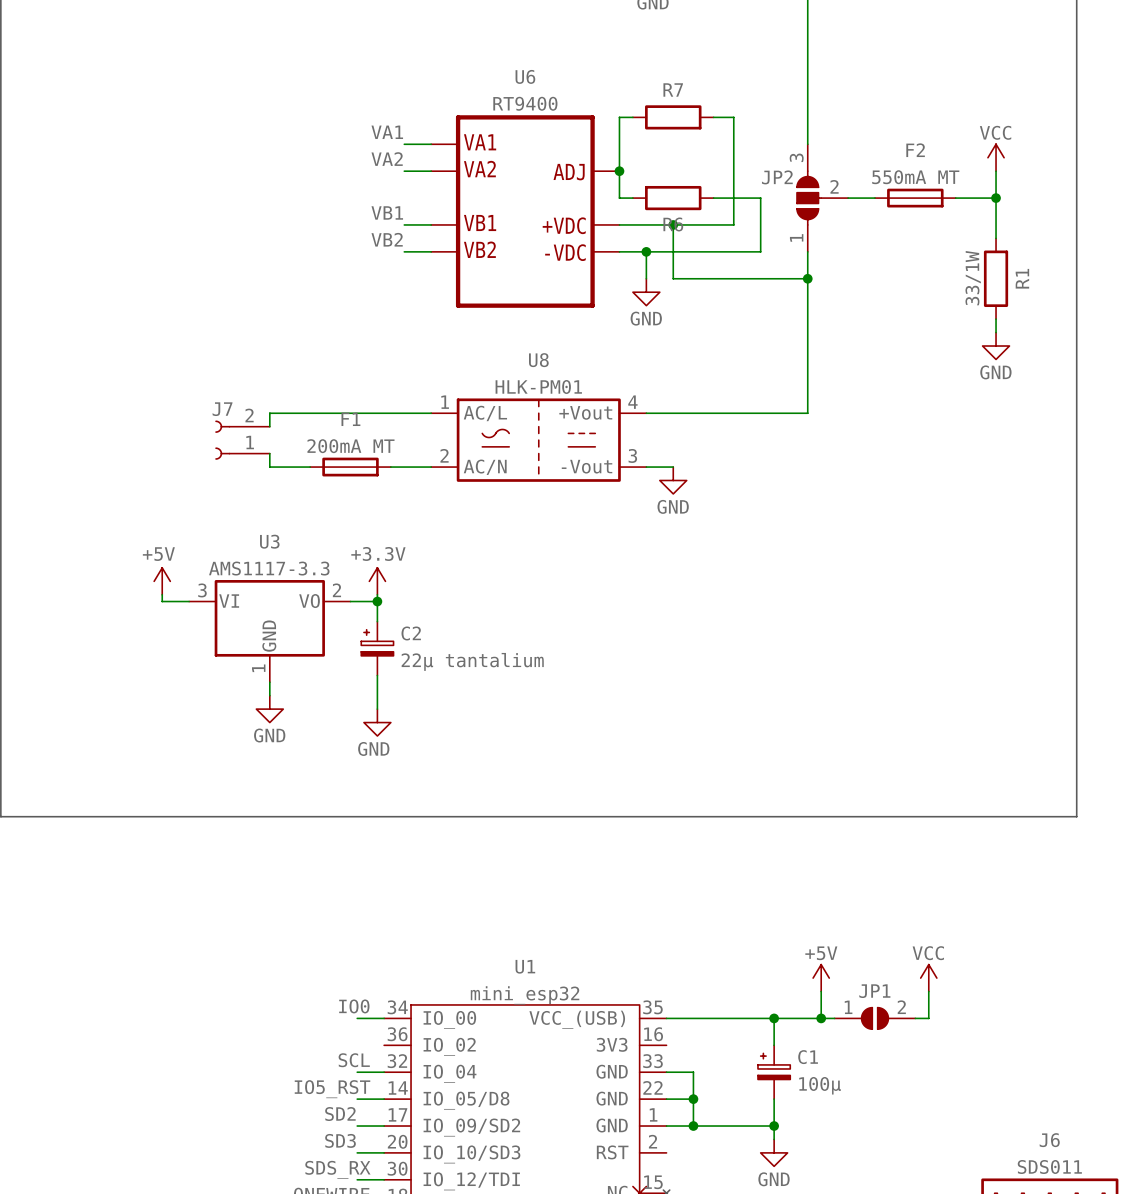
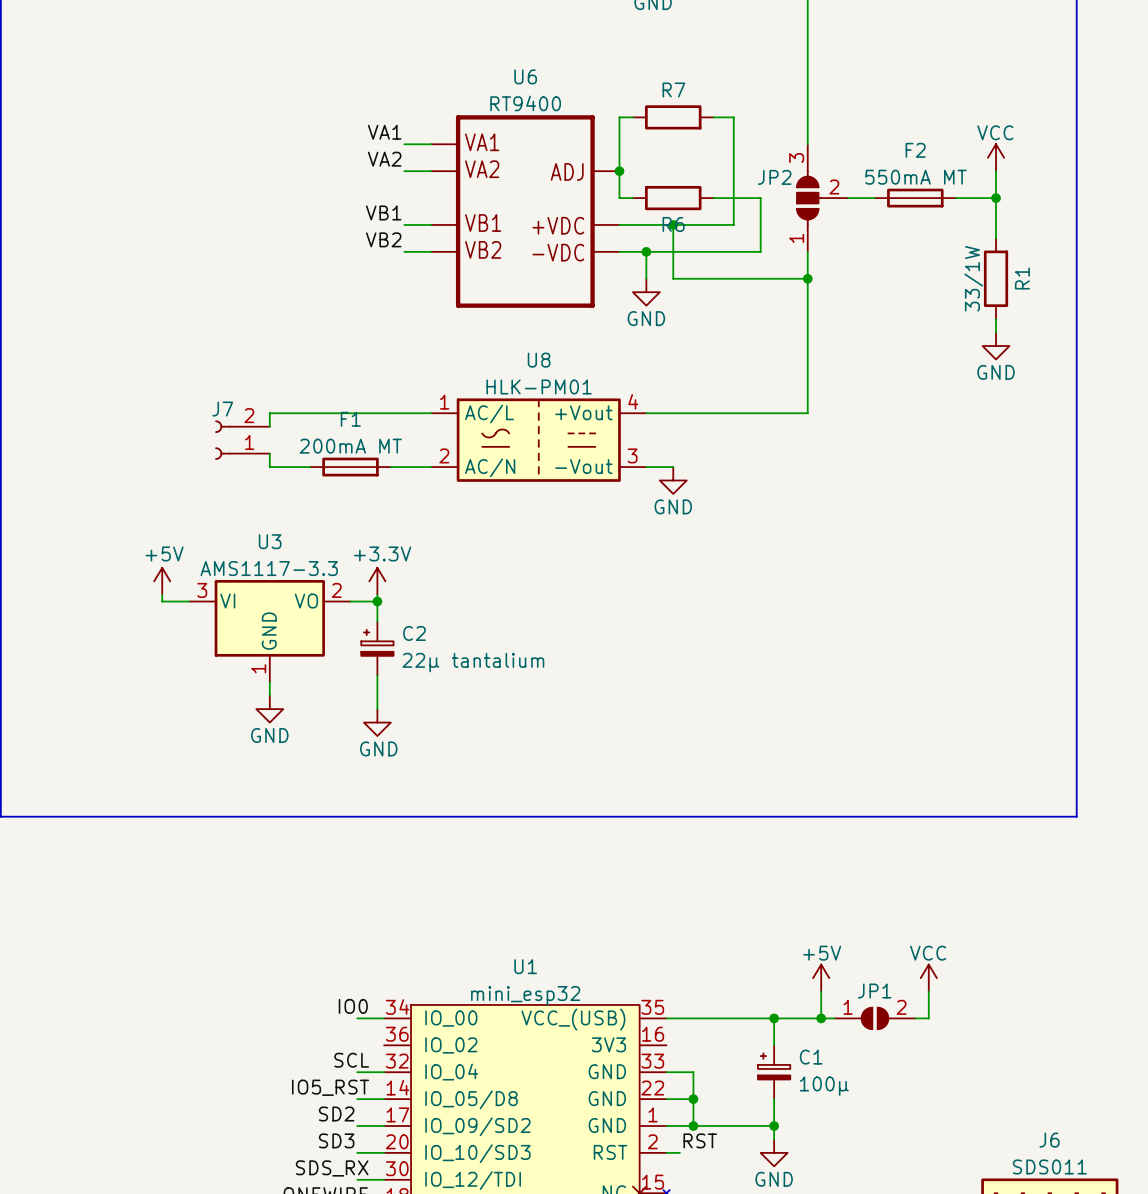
label: none -> RST (700, 1140)
wire: none -> (666, 1152) (679, 1152)

